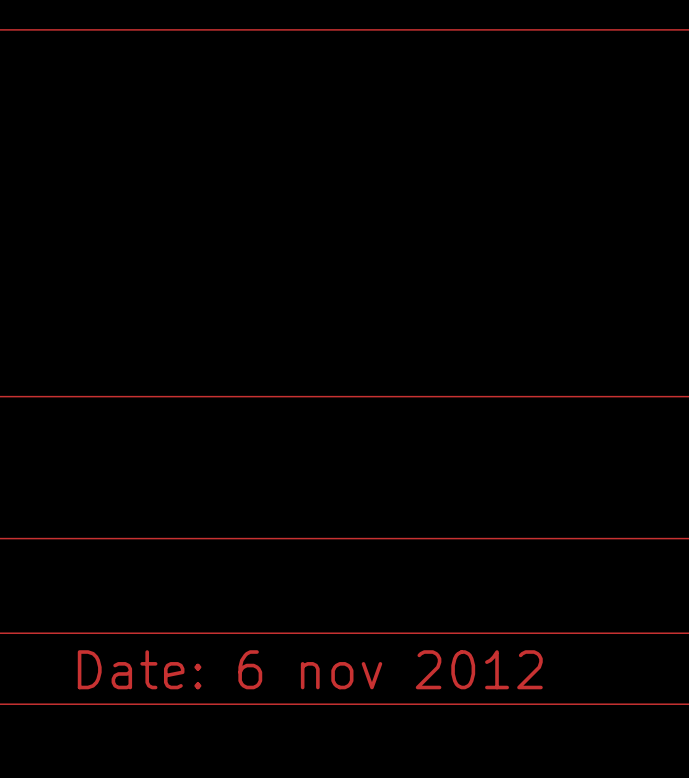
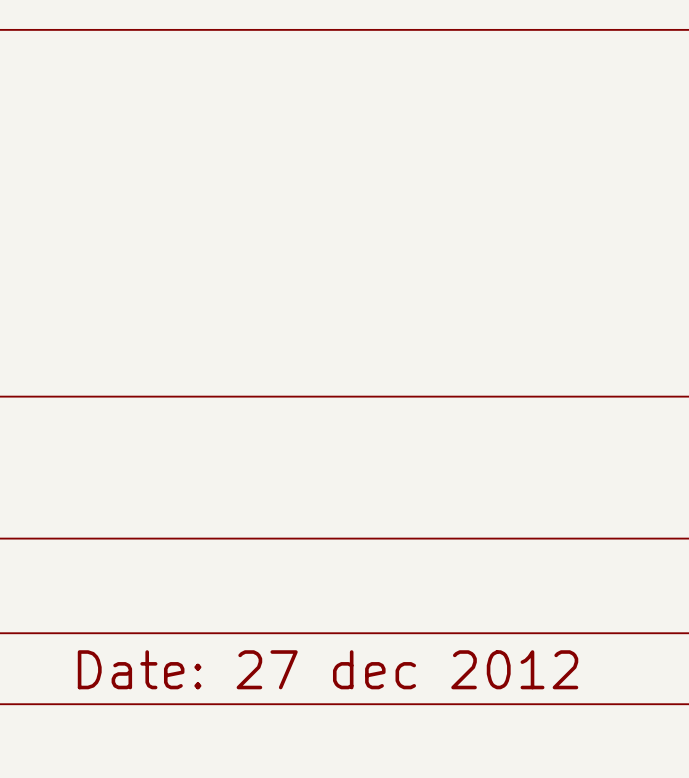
title block: Date: 6 nov 2012 (310, 669) -> Date: 27 dec 2012 (328, 669)

